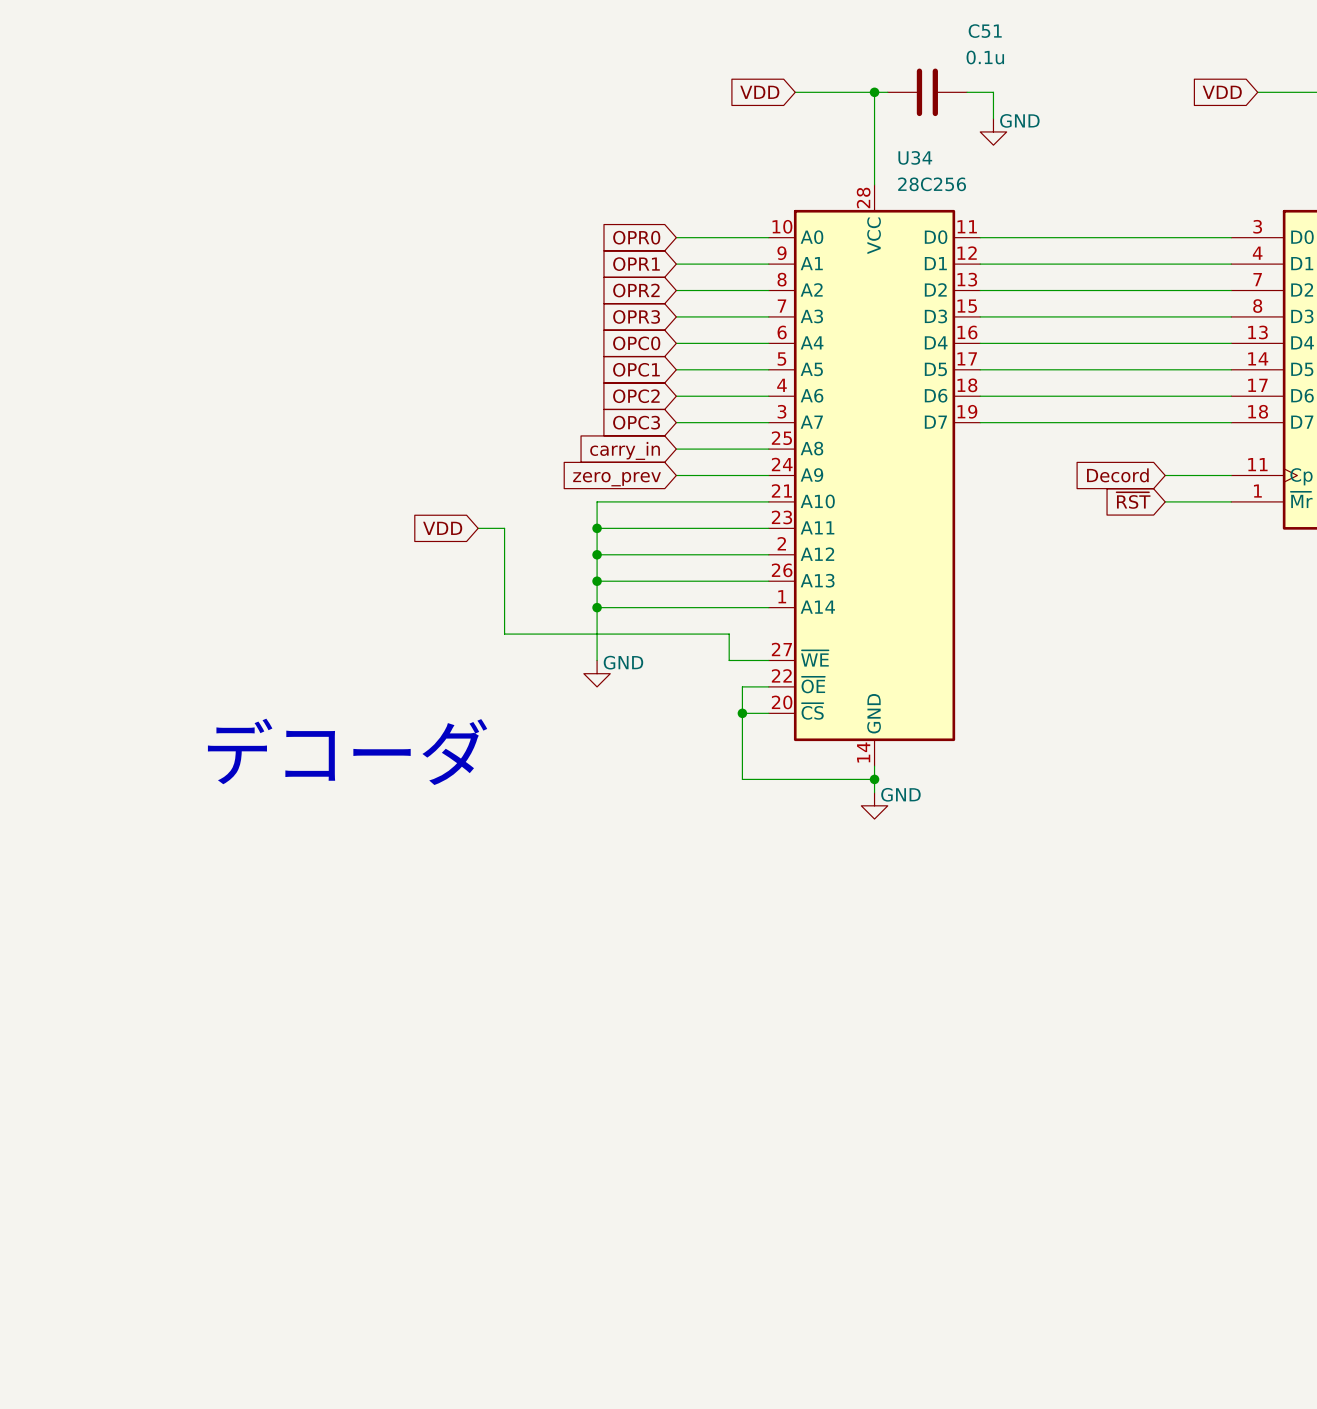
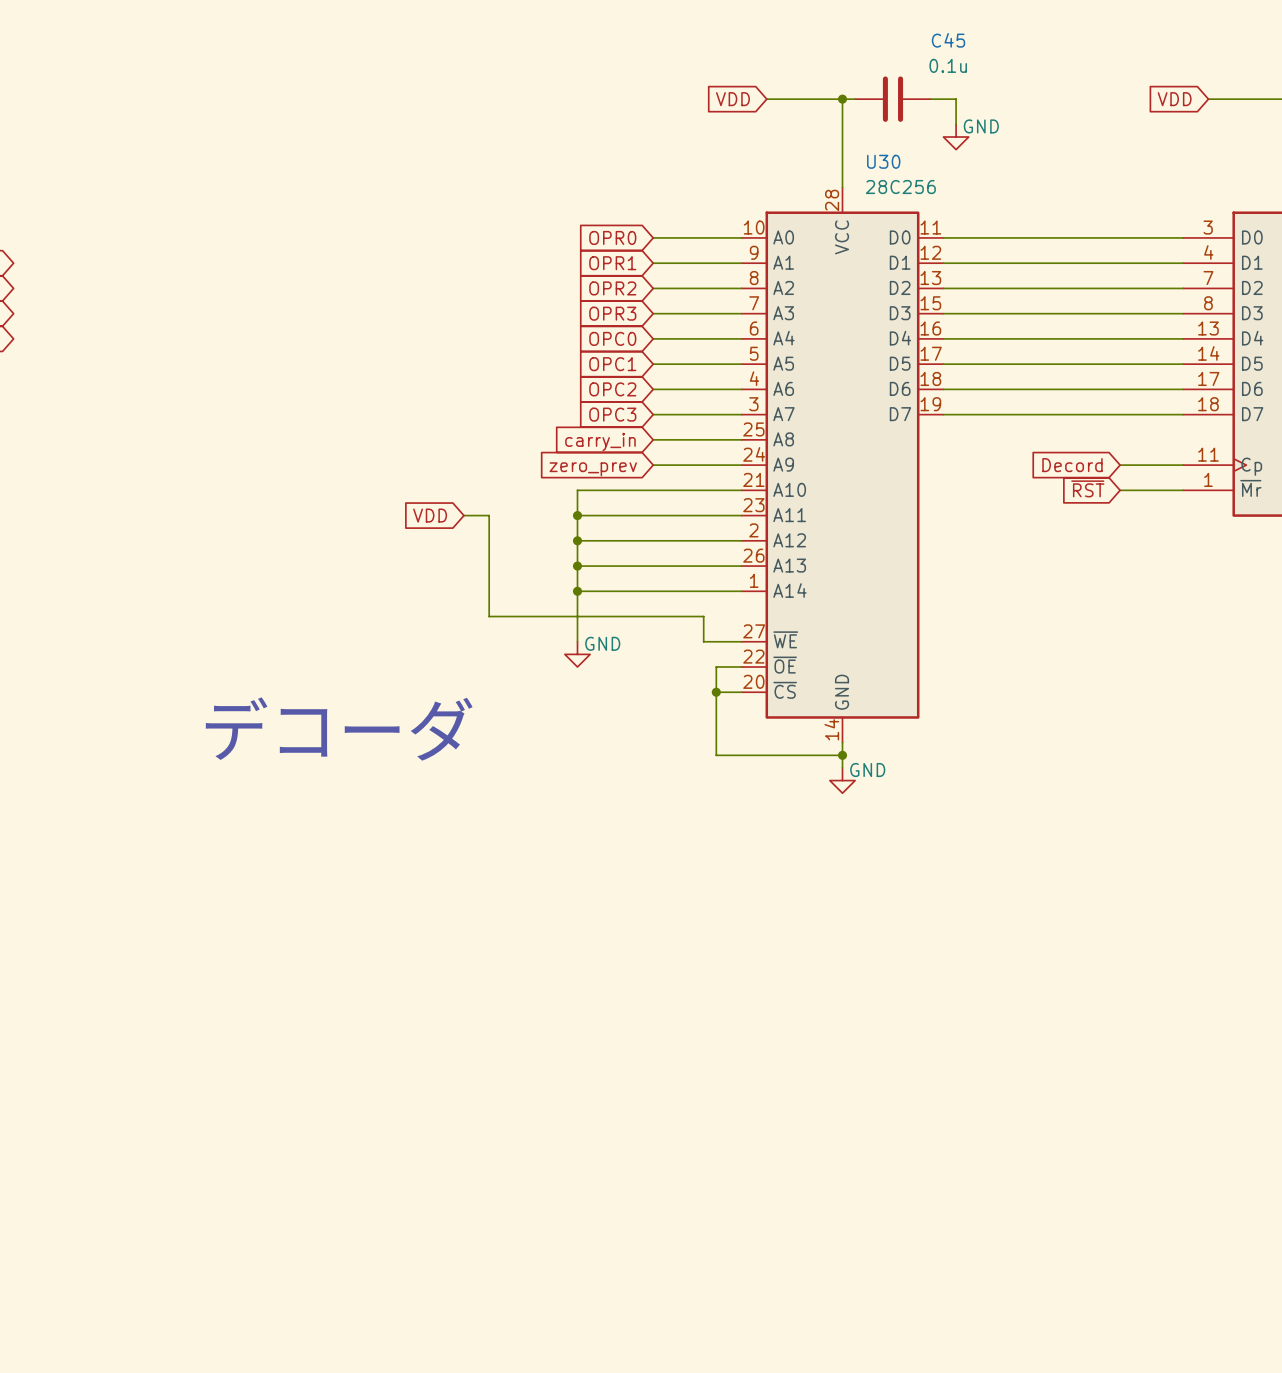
C51 name: C51 (985, 31) -> C45 (948, 40)
U34 name: U34 (915, 157) -> U30 (883, 161)

